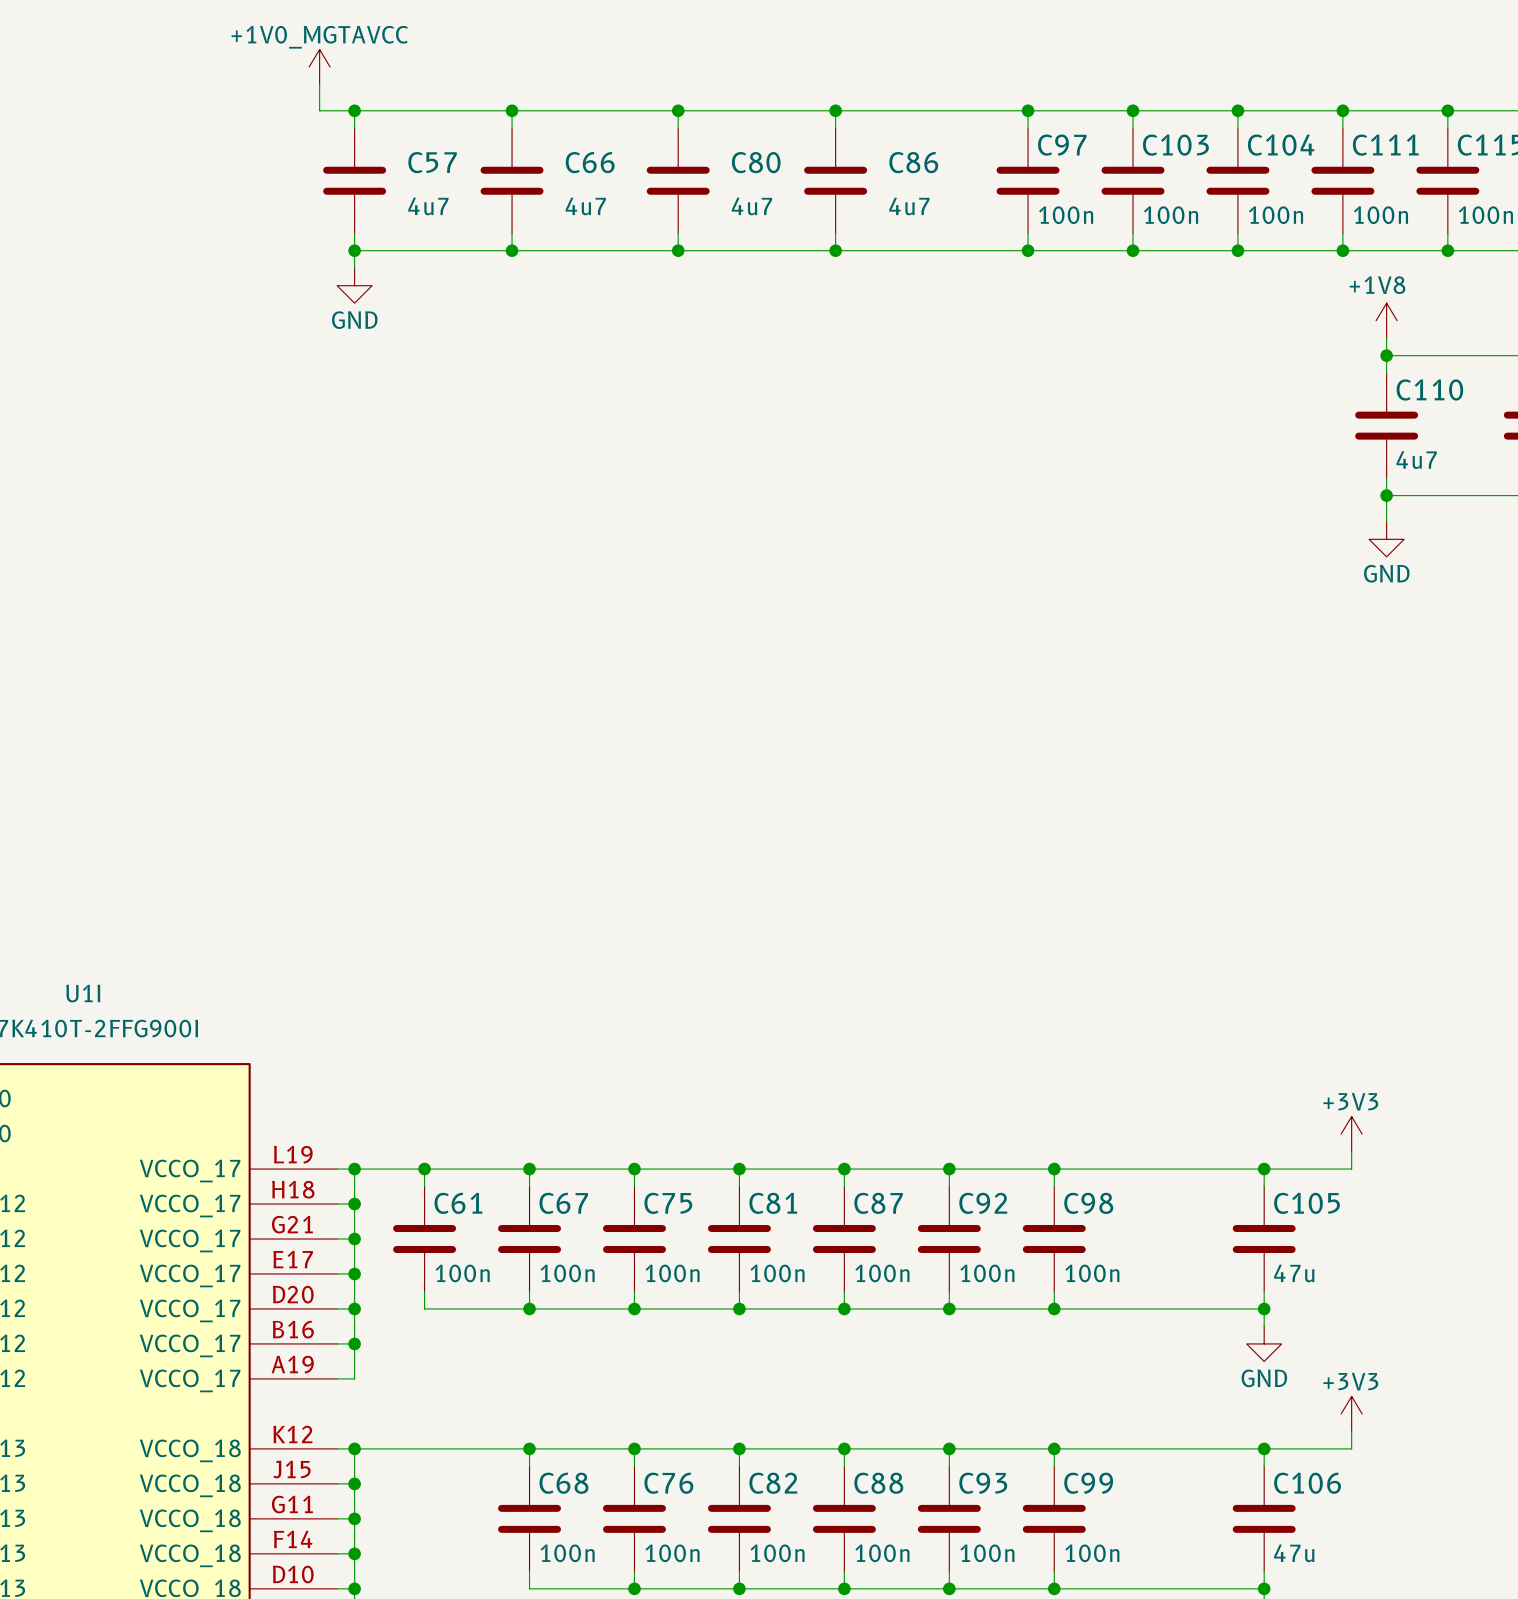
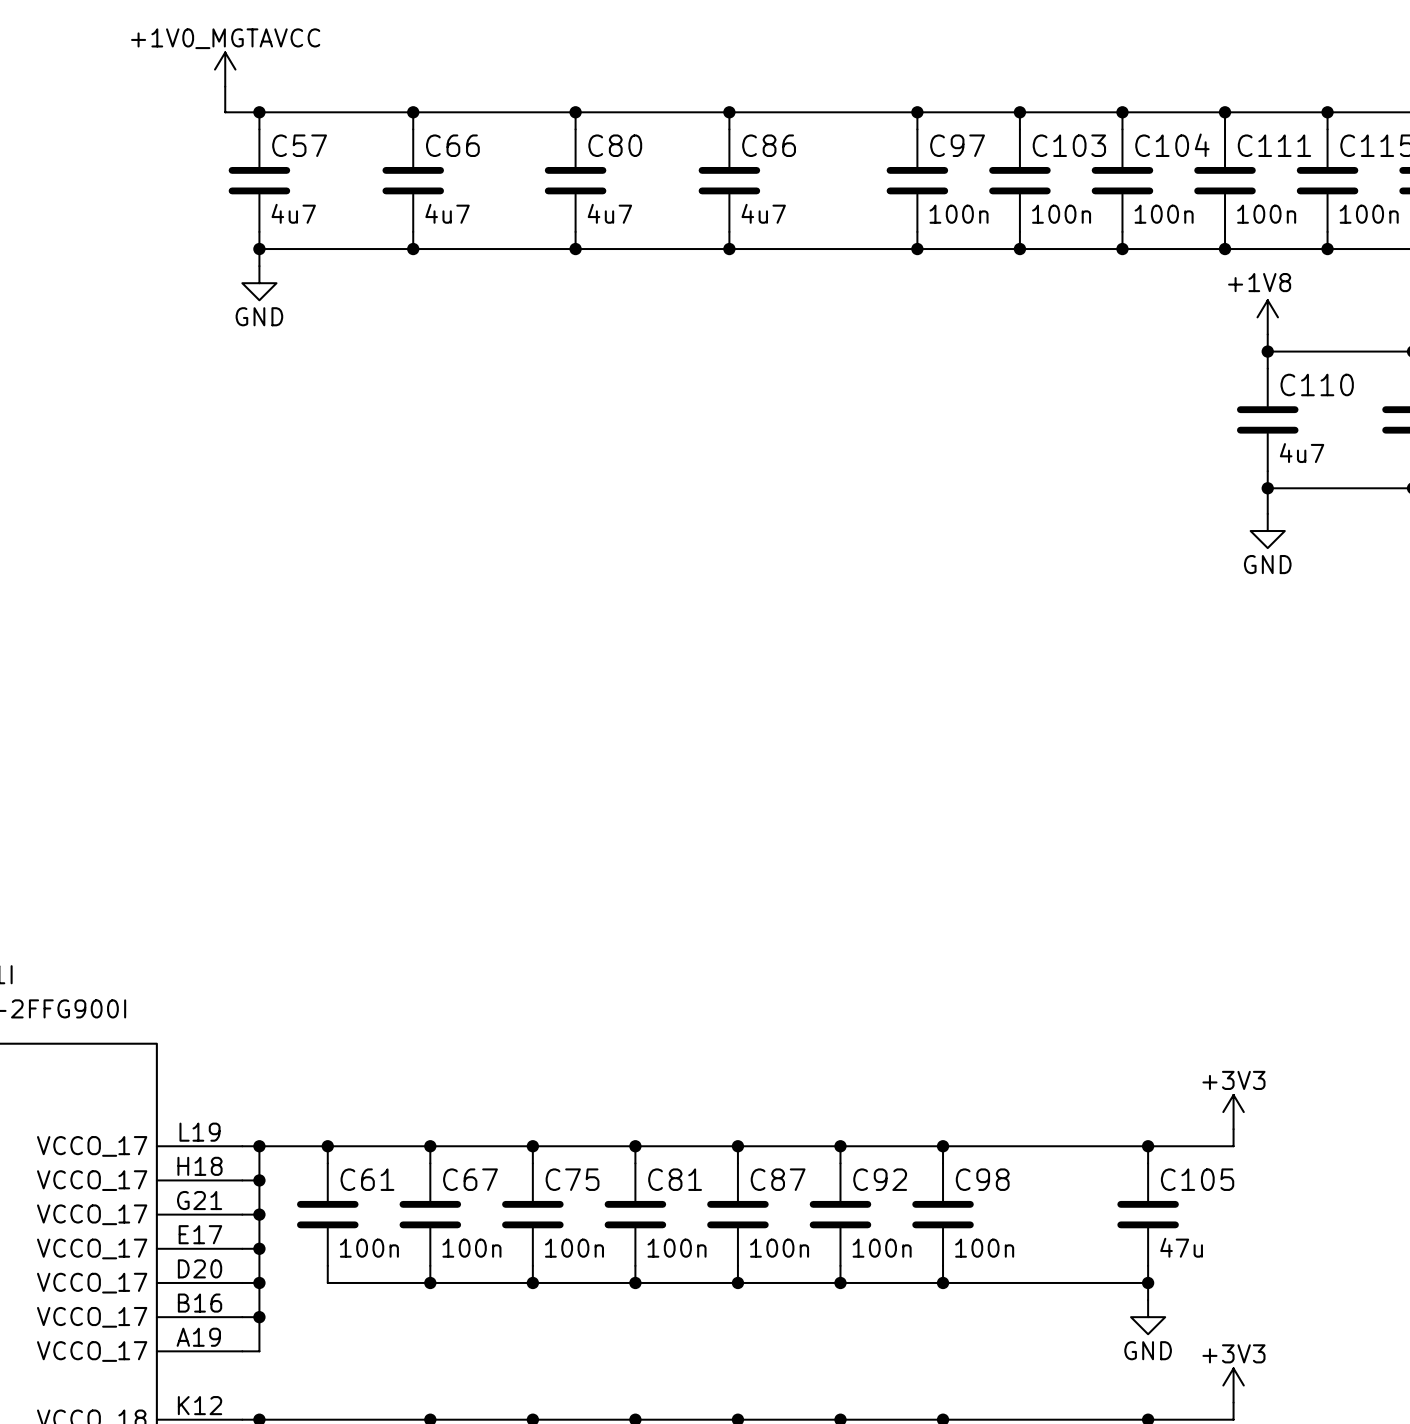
C57 name position: C57 (432, 162) -> C57 (299, 145)
C66 name position: C66 (590, 162) -> C66 (452, 145)
C80 name position: C80 (756, 162) -> C80 (615, 145)
C86 name position: C86 (913, 162) -> C86 (769, 145)
C57 text position: 4u7 (428, 206) -> 4u7 (293, 213)
C66 text position: 4u7 (585, 206) -> 4u7 (447, 213)
C80 text position: 4u7 (751, 206) -> 4u7 (609, 213)
C86 text position: 4u7 (909, 206) -> 4u7 (763, 213)

